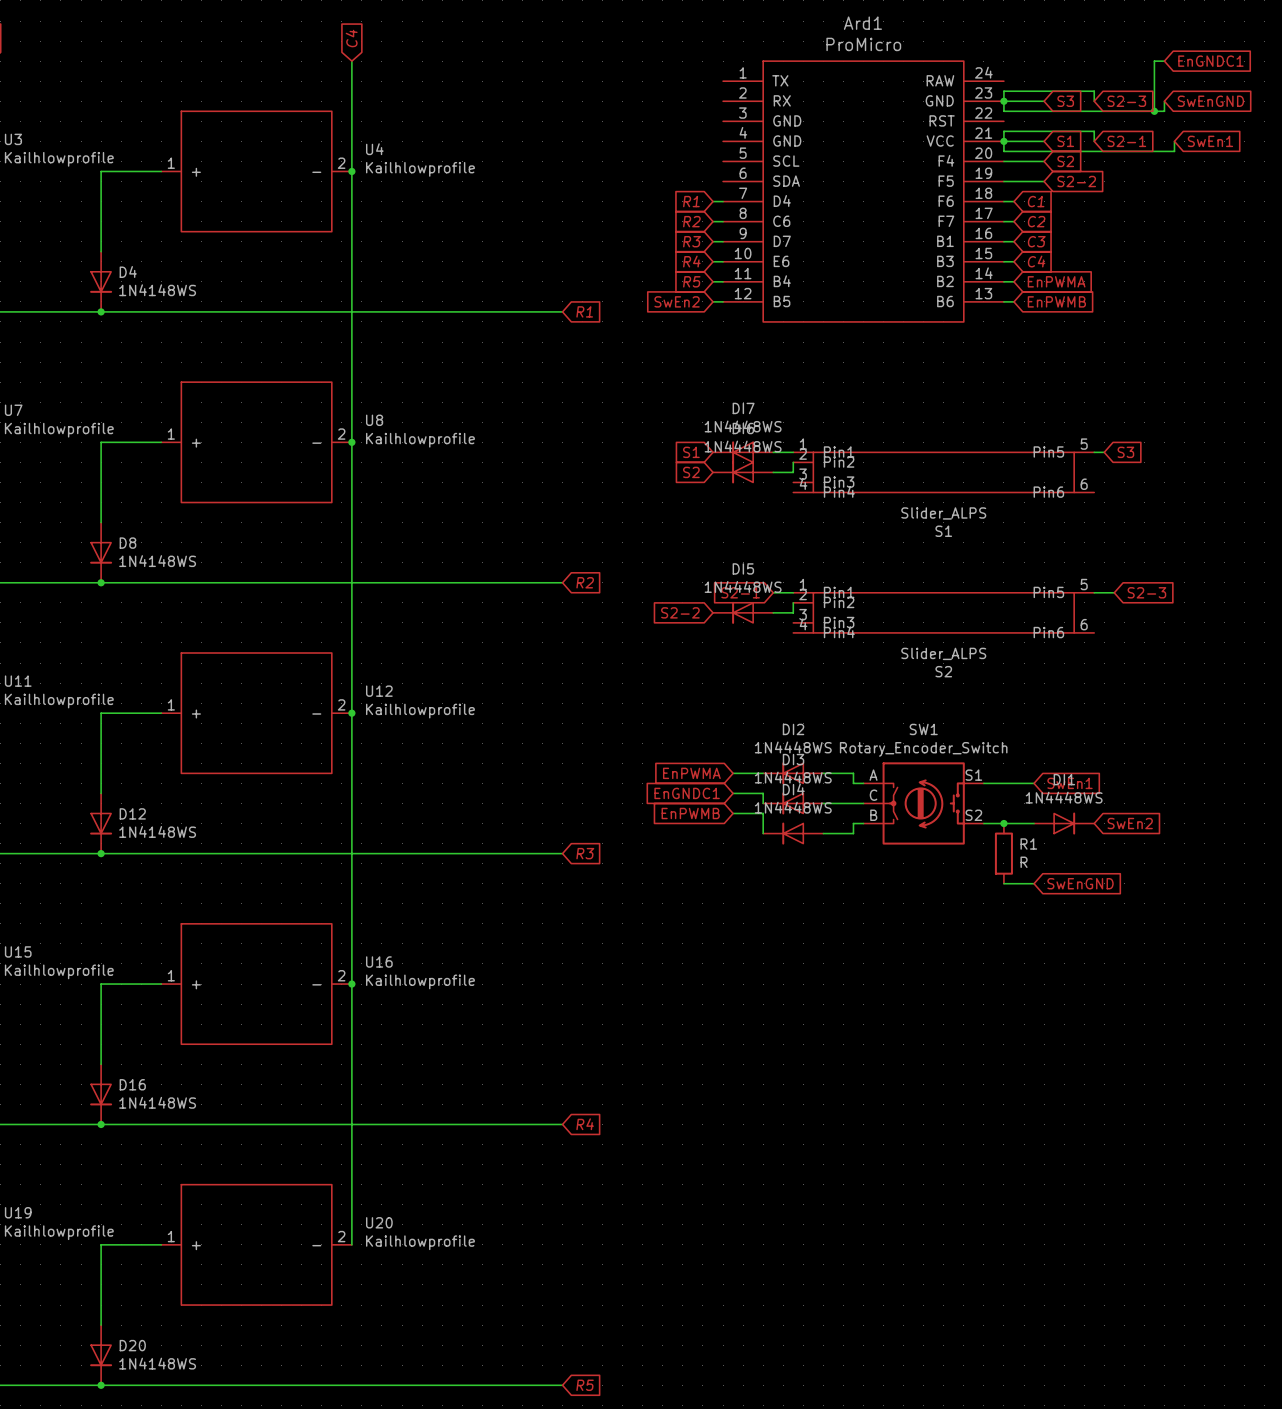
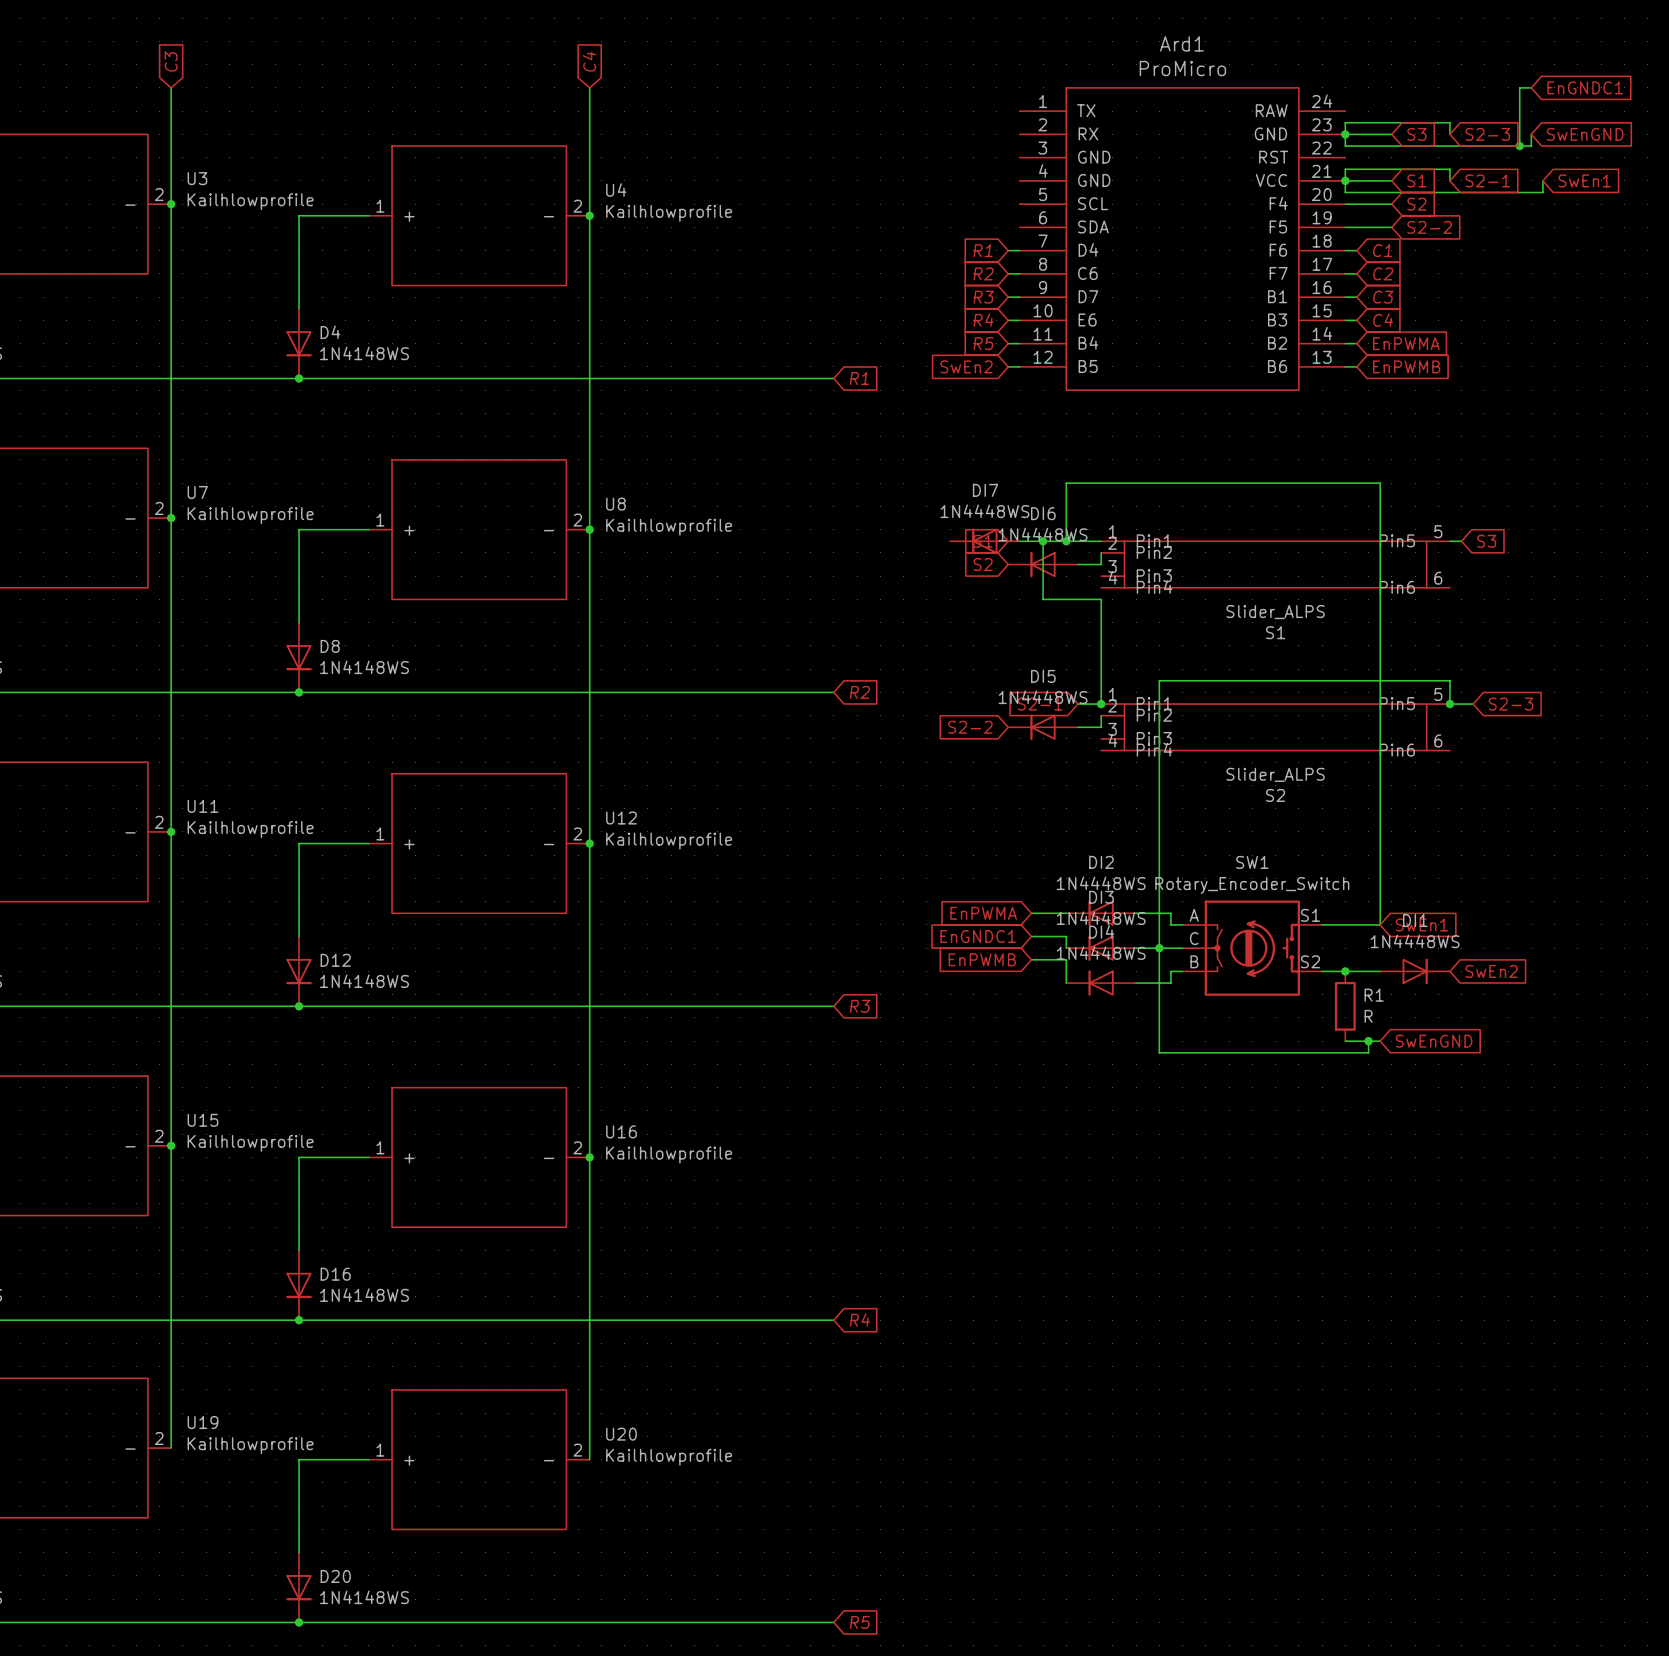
wire: none -> (1043, 541) (1043, 599) (1101, 599) (1101, 704)
DI7 position: (743, 452) -> (984, 541)
junction: none -> (1043, 541)
wire: none -> (1066, 541) (1066, 483) (1380, 483) (1380, 924)
junction: none -> (1066, 541)
junction: none -> (1101, 704)
wire: none -> (1449, 704) (1449, 680) (1159, 680) (1159, 1052) (1368, 1052) (1368, 1041)
junction: none -> (1449, 704)
junction: none -> (1159, 948)
junction: none -> (1368, 1041)

